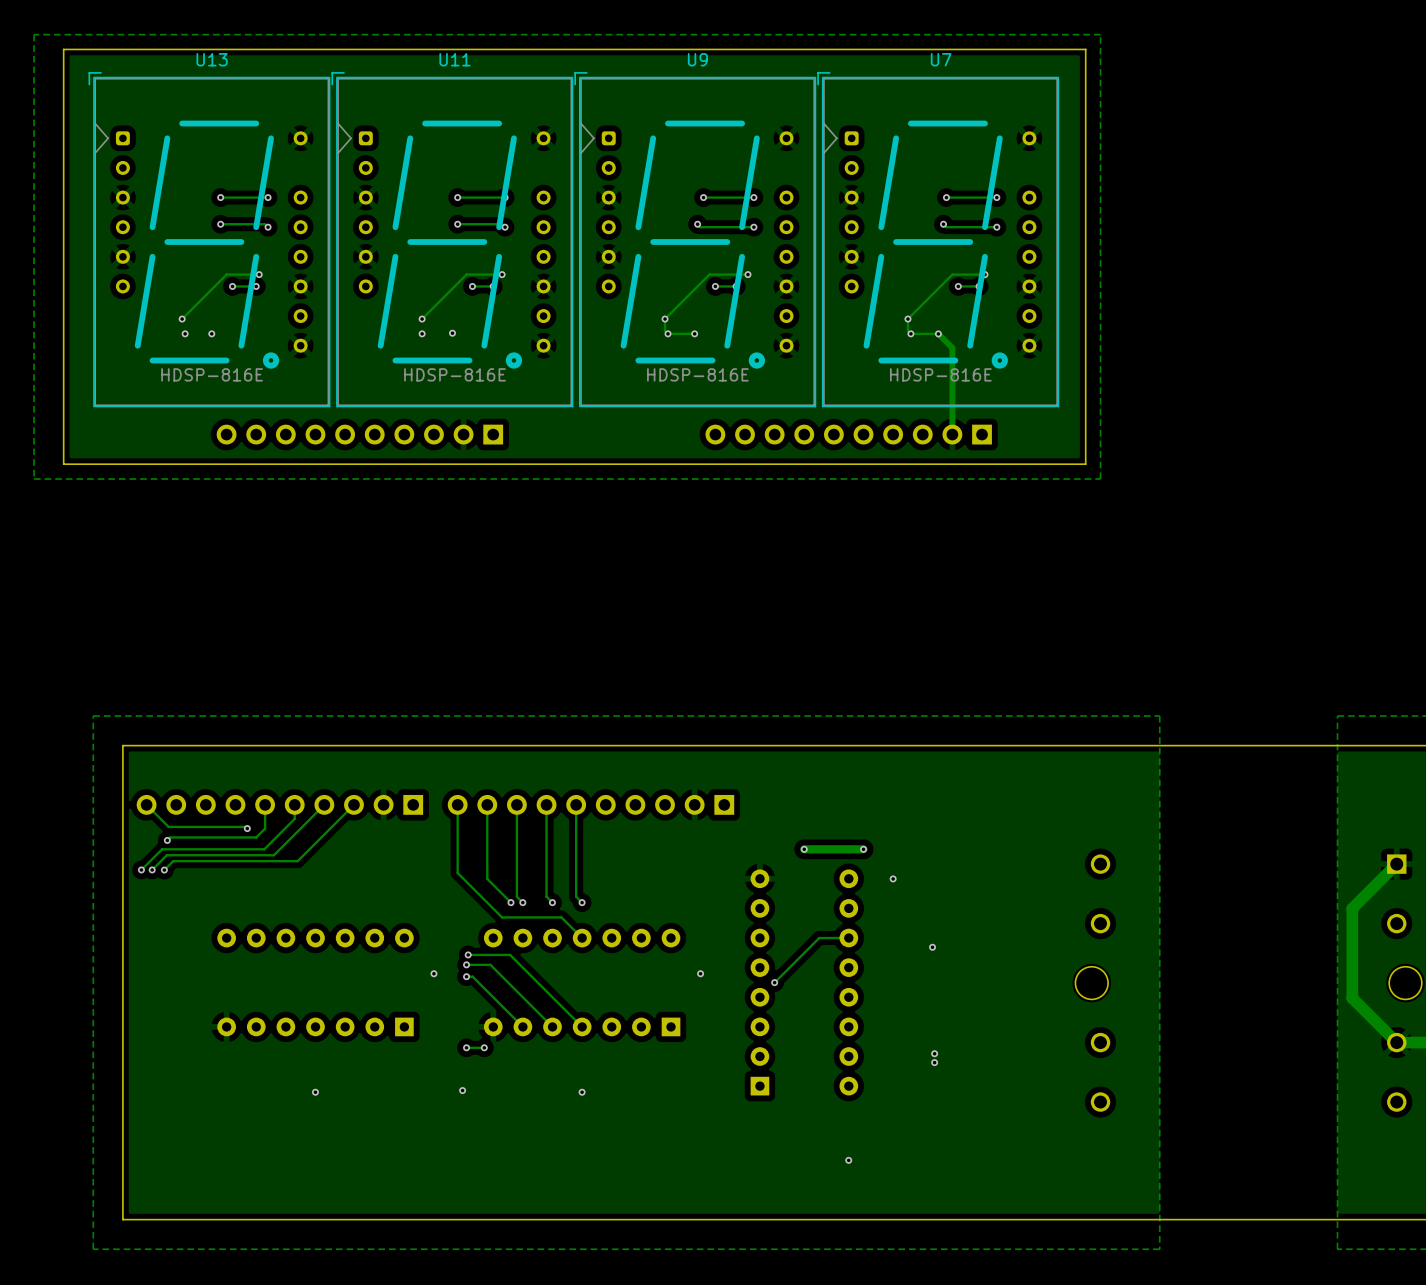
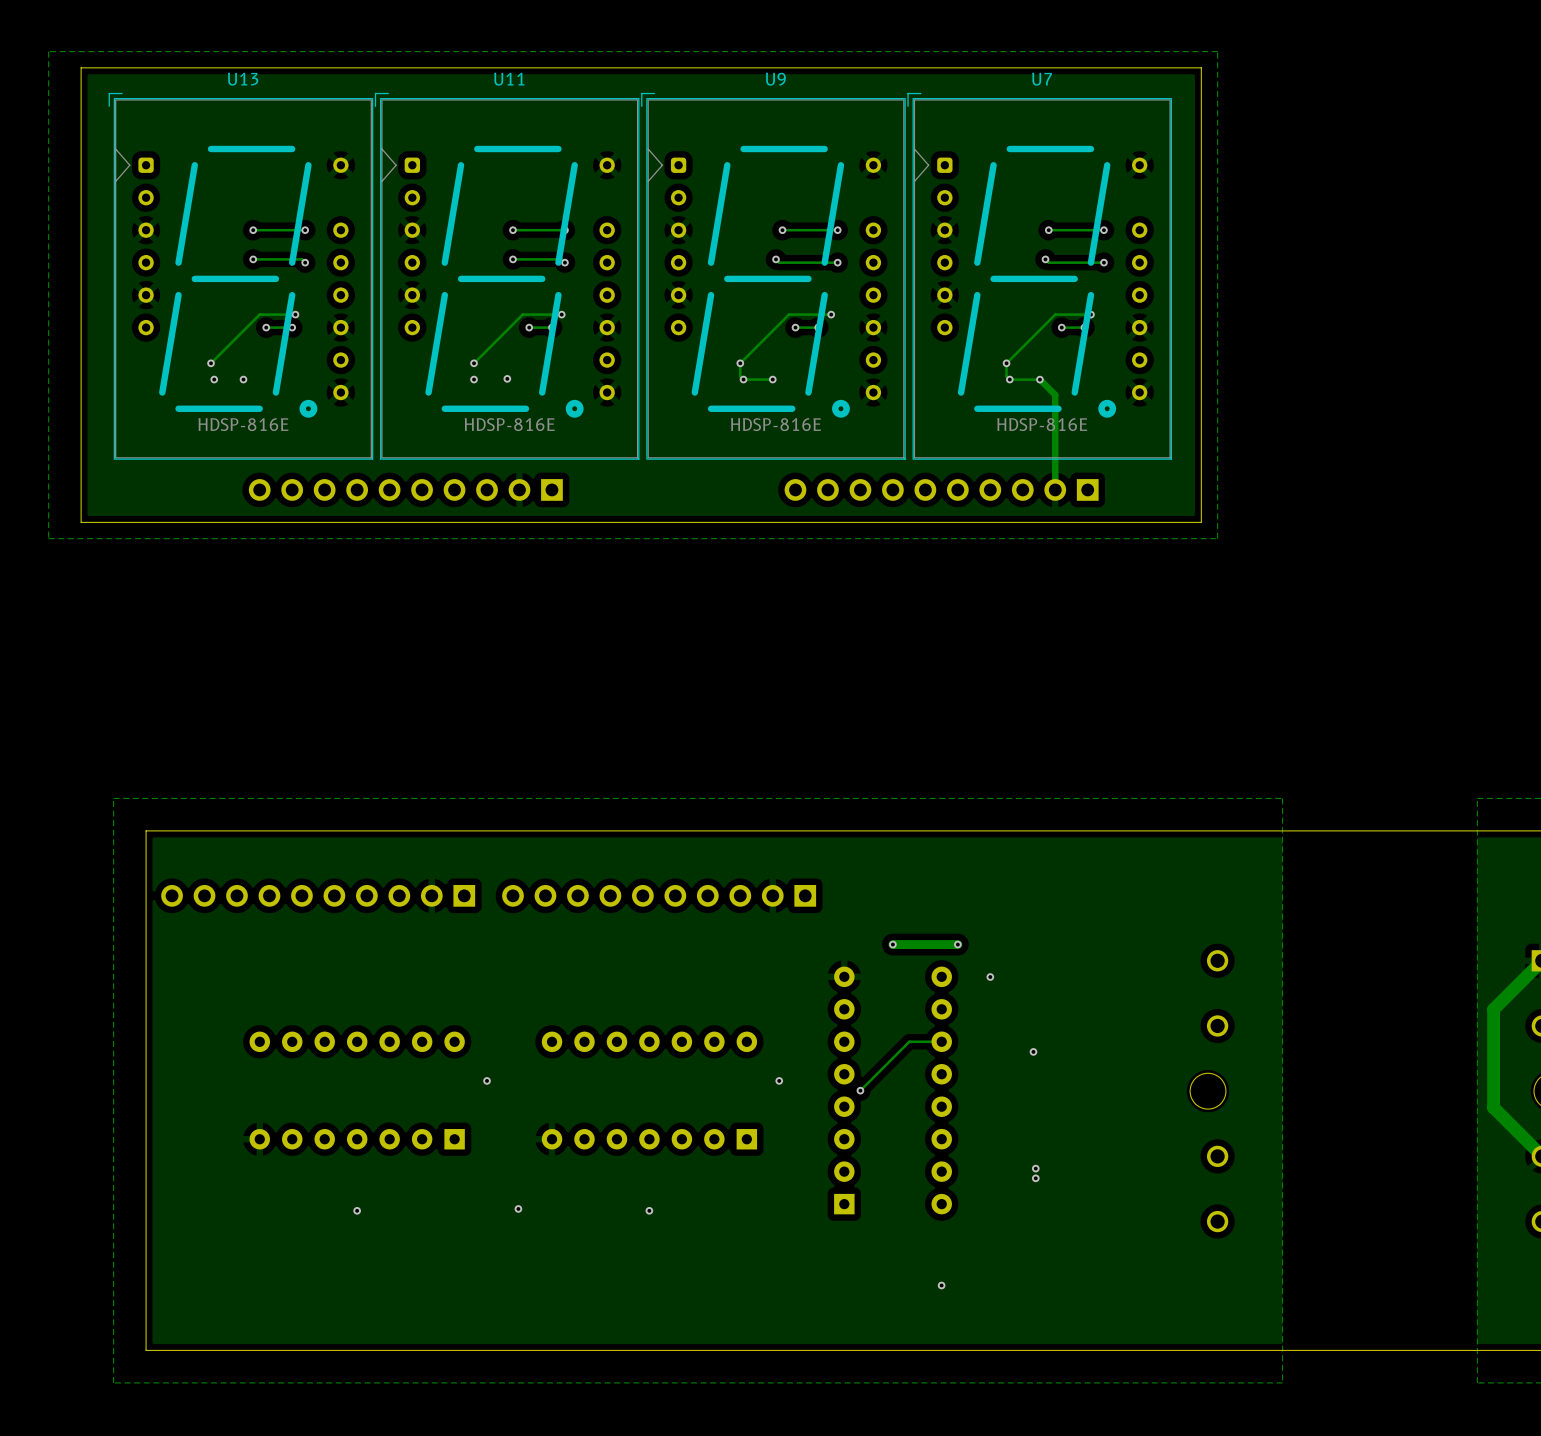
track: (146, 804) (168, 826) (245, 826) (247, 828) -> none
track: (265, 804) (265, 828) (256, 837) (170, 837) (167, 840) -> none
track: (294, 804) (294, 818) (264, 849) (162, 849) (141, 869) -> none
track: (324, 804) (273, 855) (166, 855) (152, 869) -> none
track: (353, 804) (297, 861) (173, 861) (164, 870) -> none
track: (457, 804) (457, 873) (502, 917) (561, 917) (582, 938) -> none
track: (487, 804) (487, 878) (510, 902) -> none
track: (516, 804) (516, 896) (522, 902) -> none
track: (546, 804) (546, 896) (552, 902) -> none
track: (576, 804) (576, 896) (582, 902) -> none
via: (247, 828) -> none
via: (167, 840) -> none
via: (141, 869) -> none
via: (152, 869) -> none
via: (164, 870) -> none
via: (510, 902) -> none
via: (522, 902) -> none
via: (552, 902) -> none
via: (582, 902) -> none
track: (468, 954) (510, 954) (582, 1026) -> none
via: (468, 954) -> none
track: (466, 964) (490, 964) (552, 1026) -> none
via: (466, 964) -> none
track: (466, 976) (472, 976) (522, 1026) -> none
via: (466, 976) -> none
via: (466, 1047) -> none
track: (484, 1047) (466, 1047) -> none
via: (484, 1047) -> none

